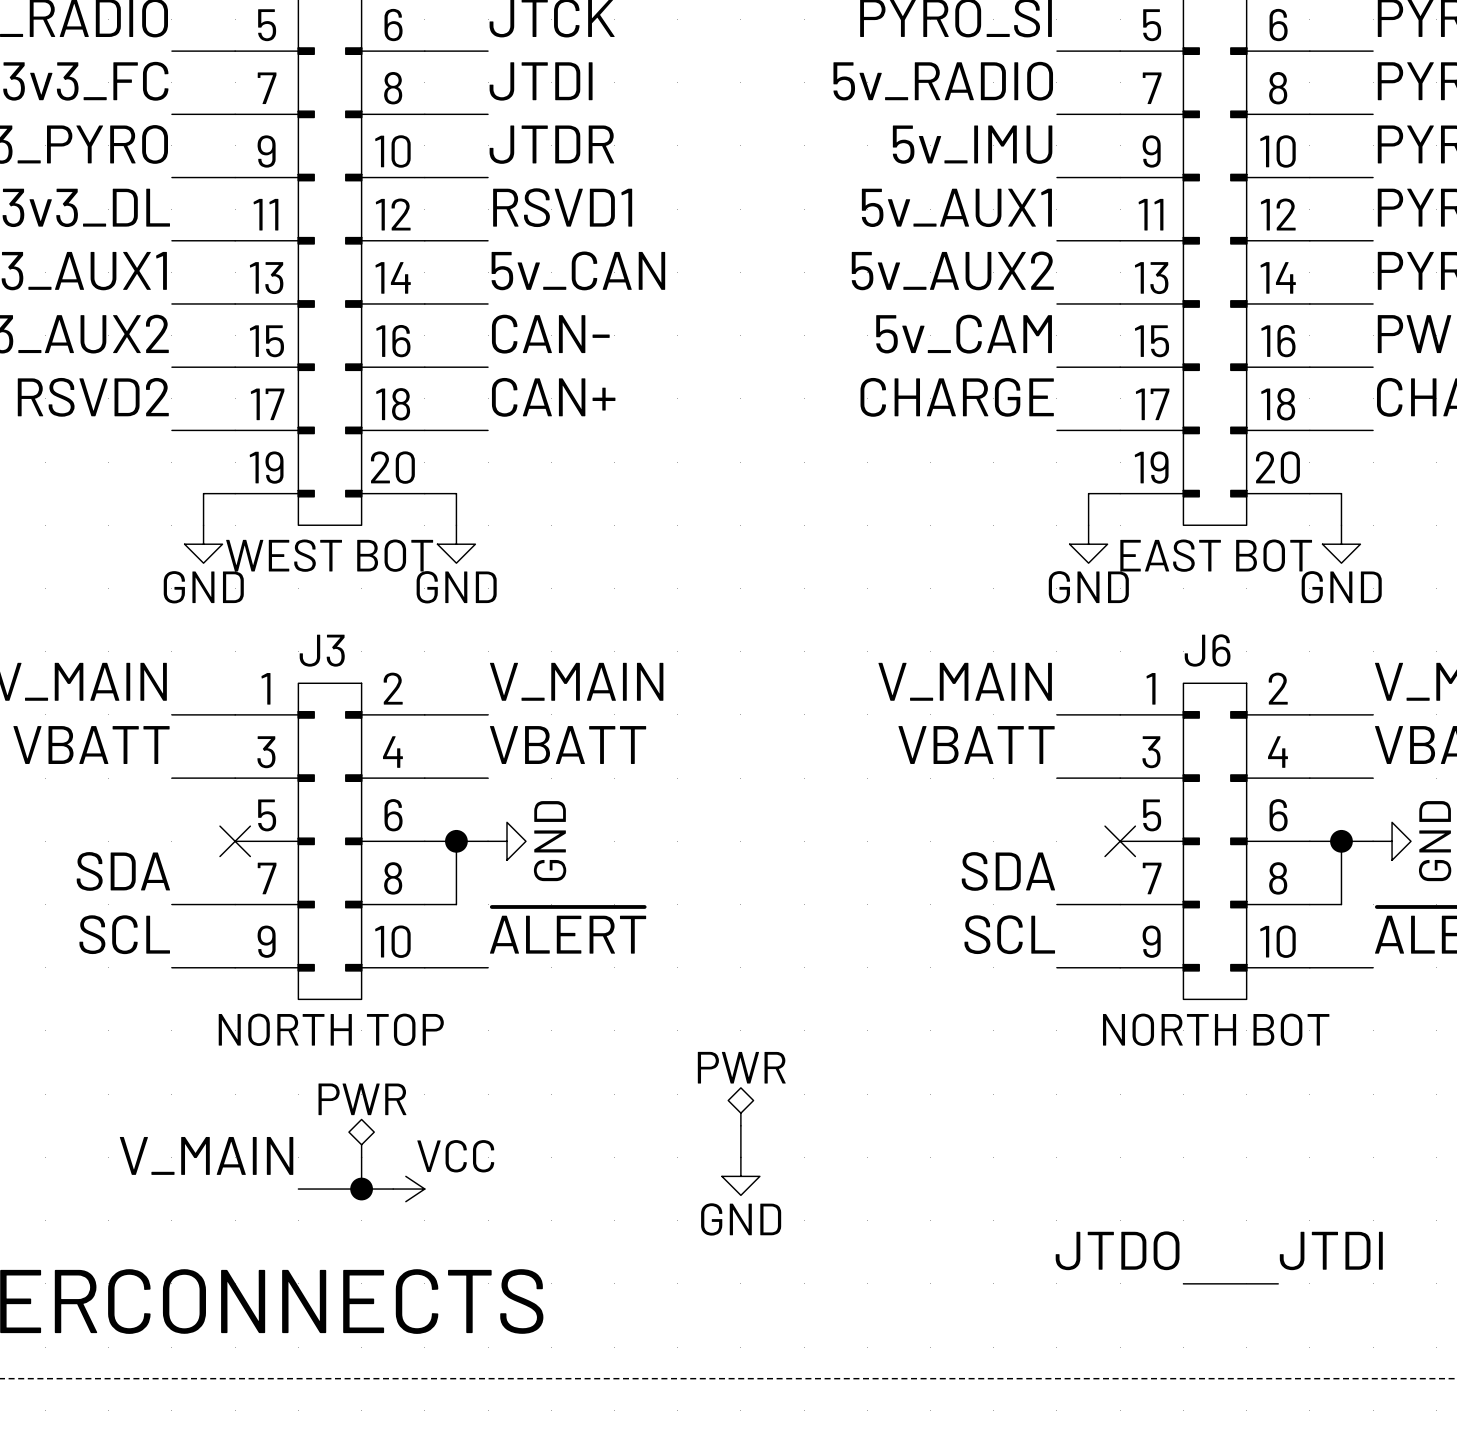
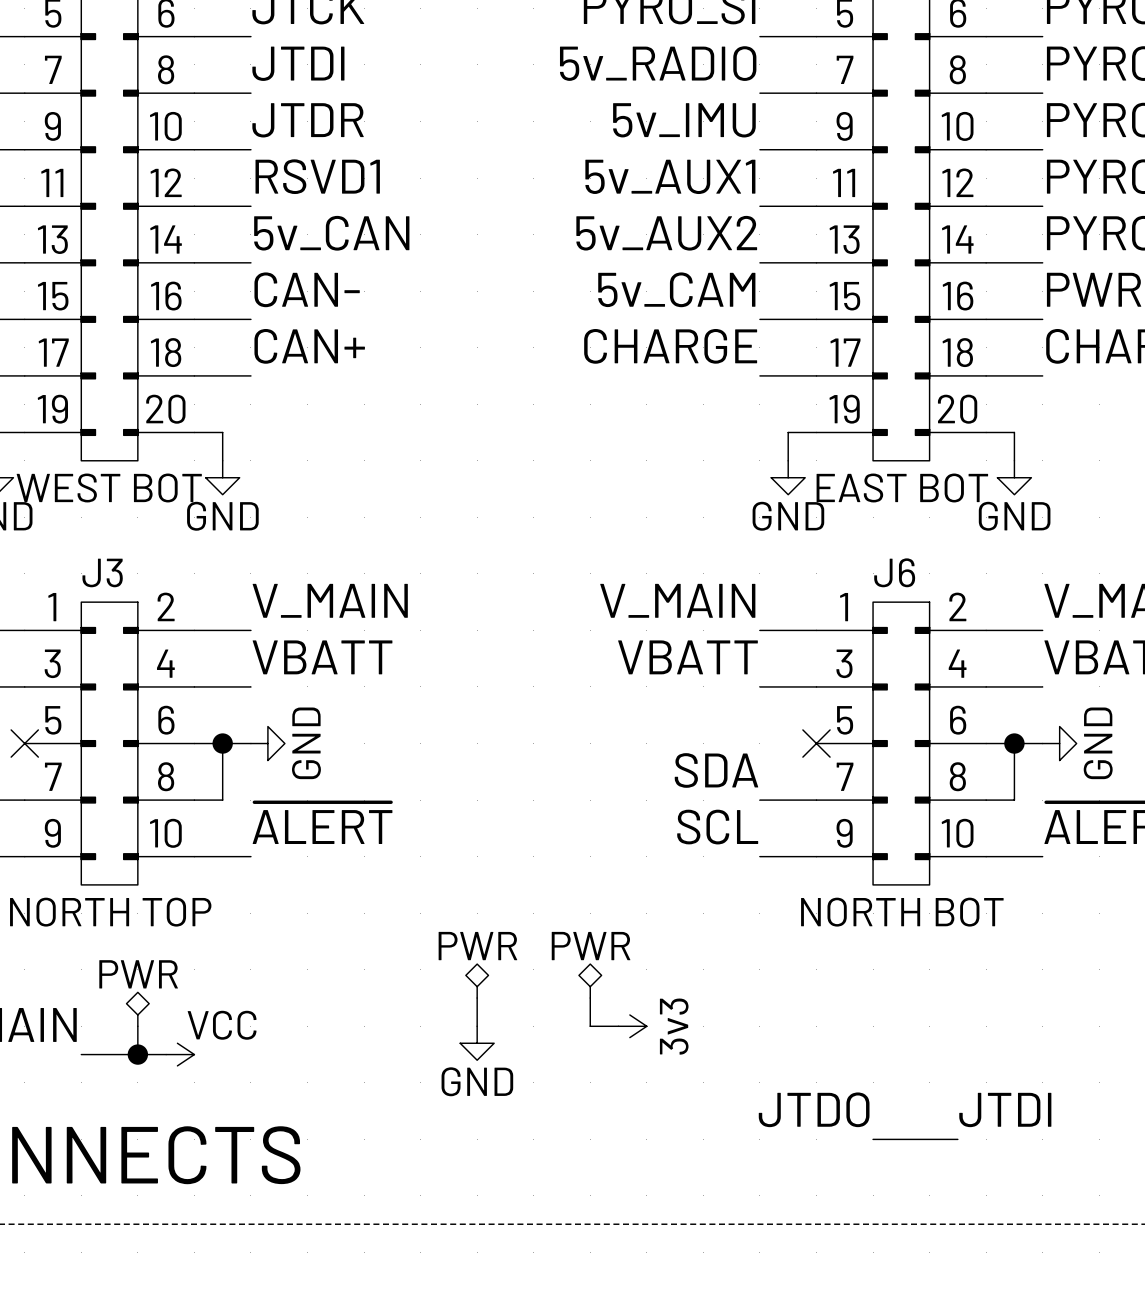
power symbol: none -> PWR (590, 981)
wire: none -> (590, 998) (590, 1026) (618, 1026)
power symbol: none -> 3v3 (632, 1026)

